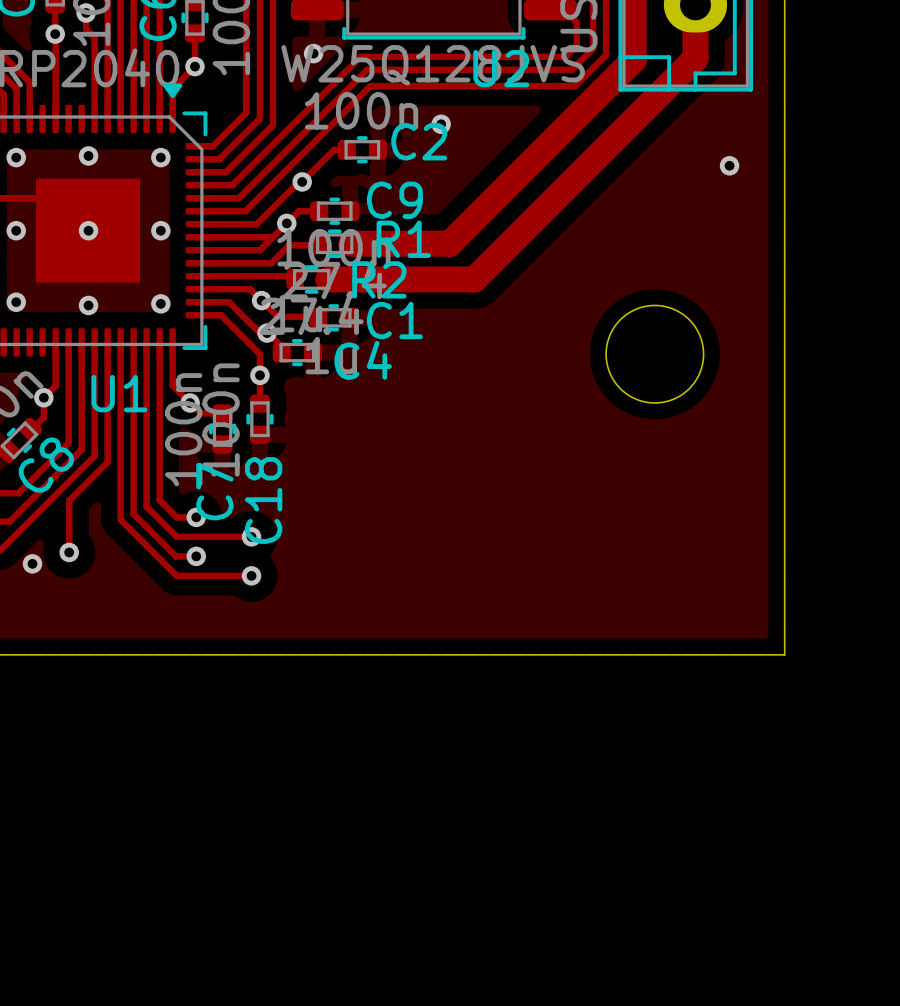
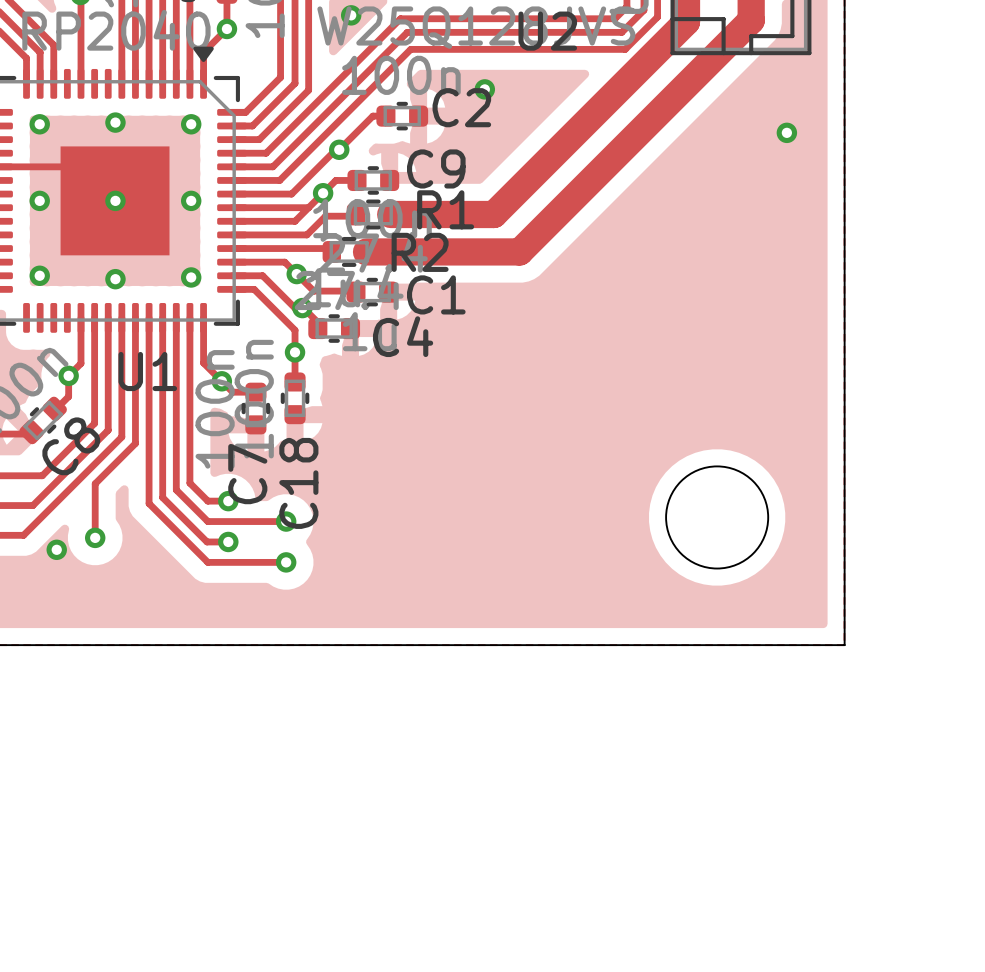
round board edge position: (654, 354) -> (717, 517)

